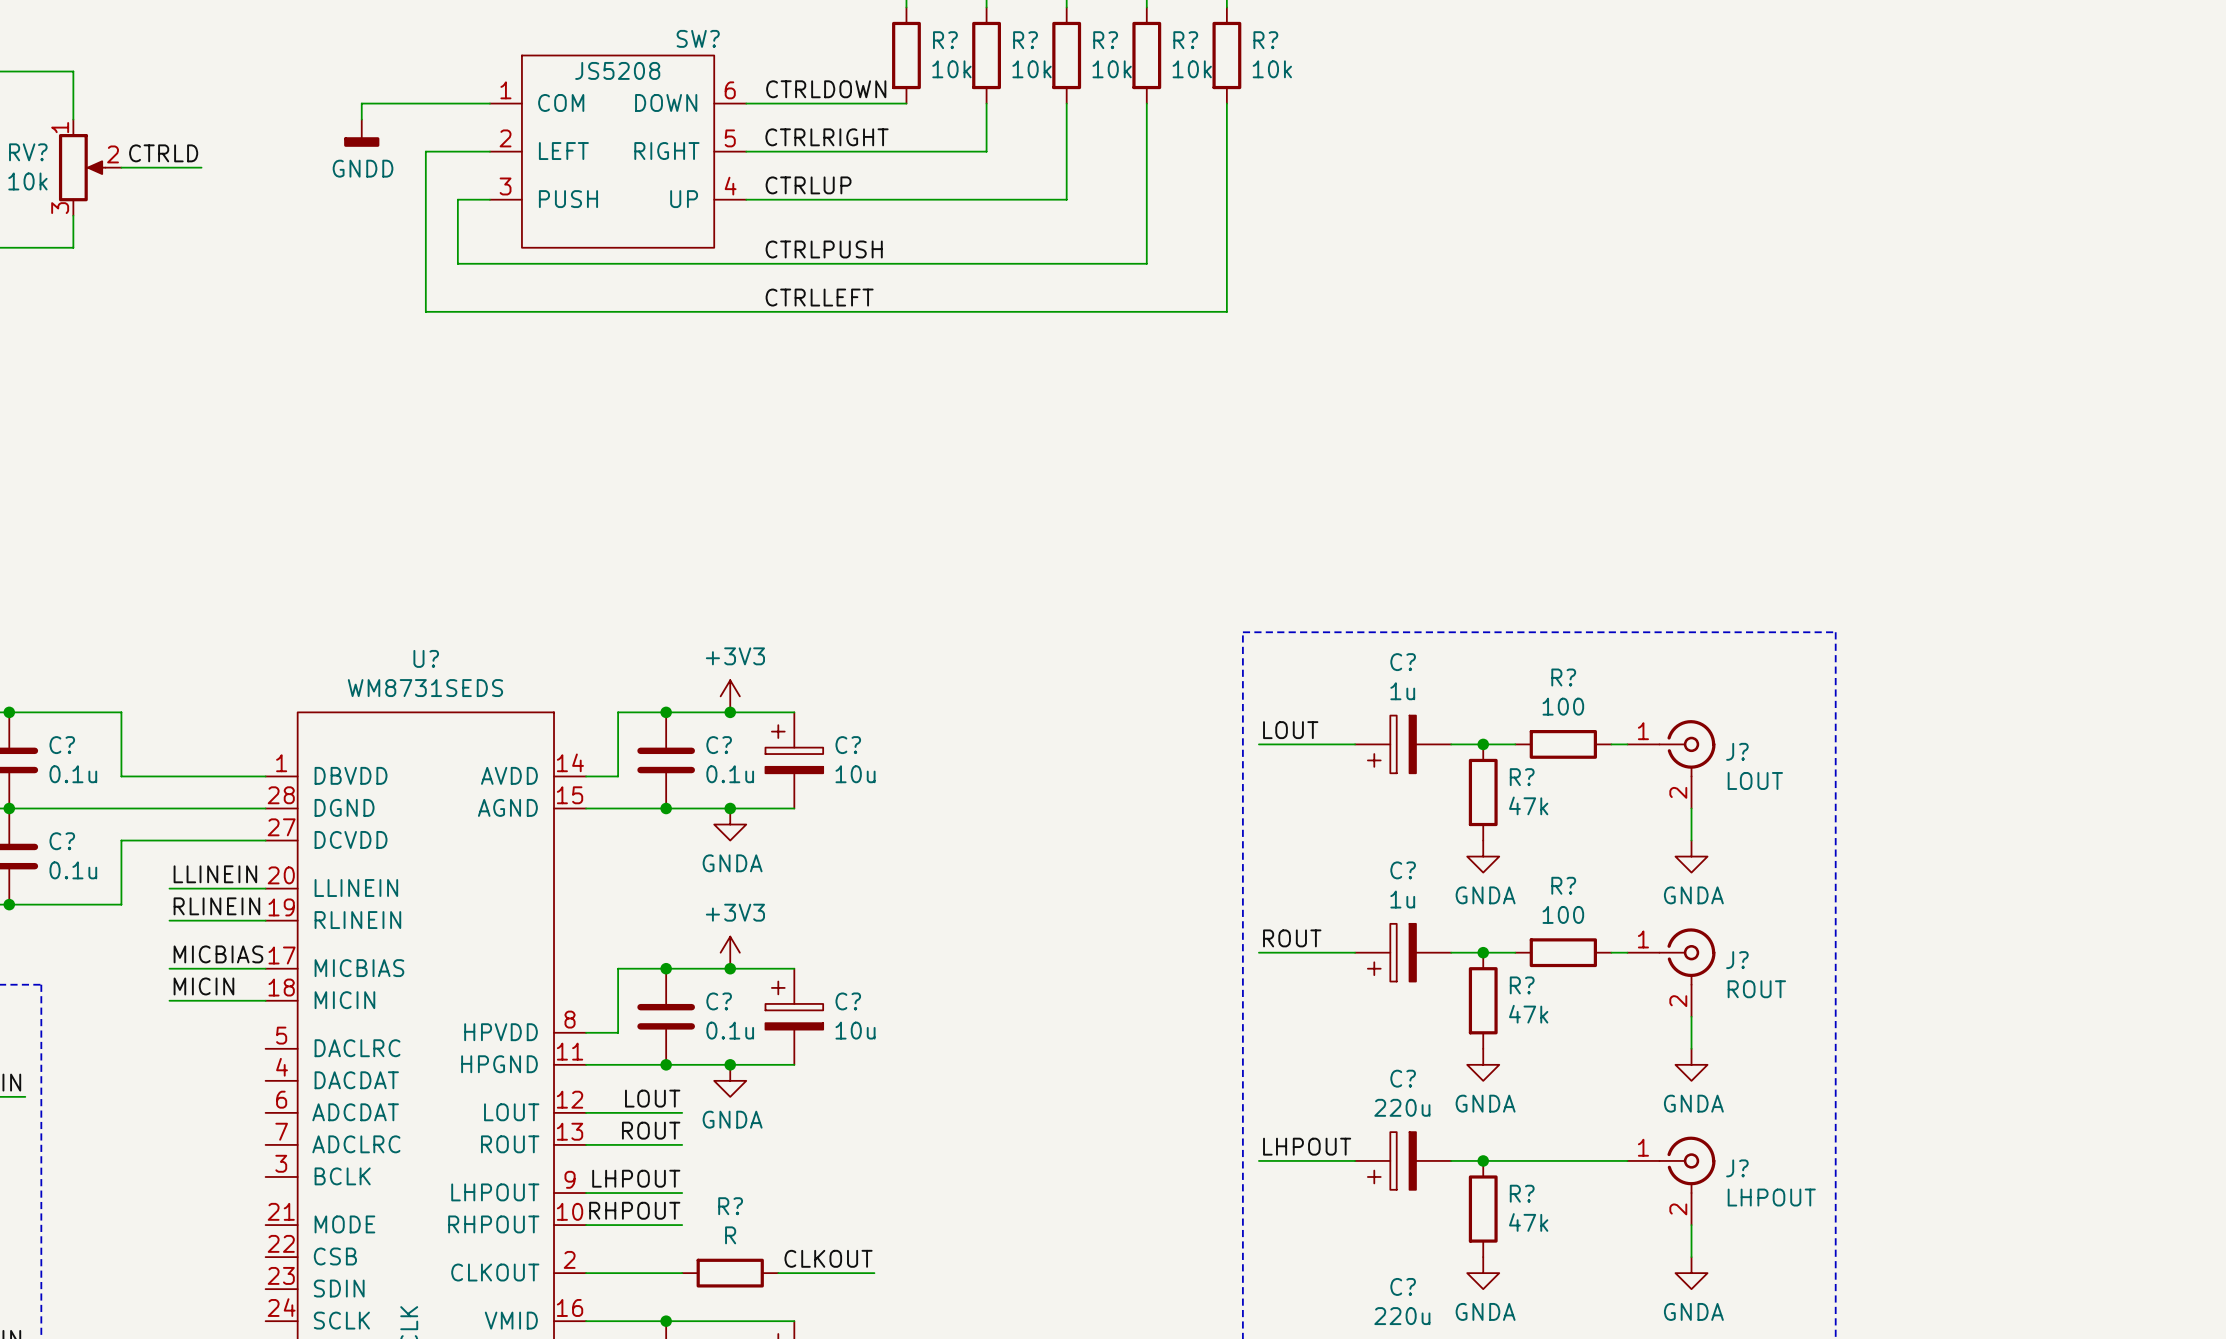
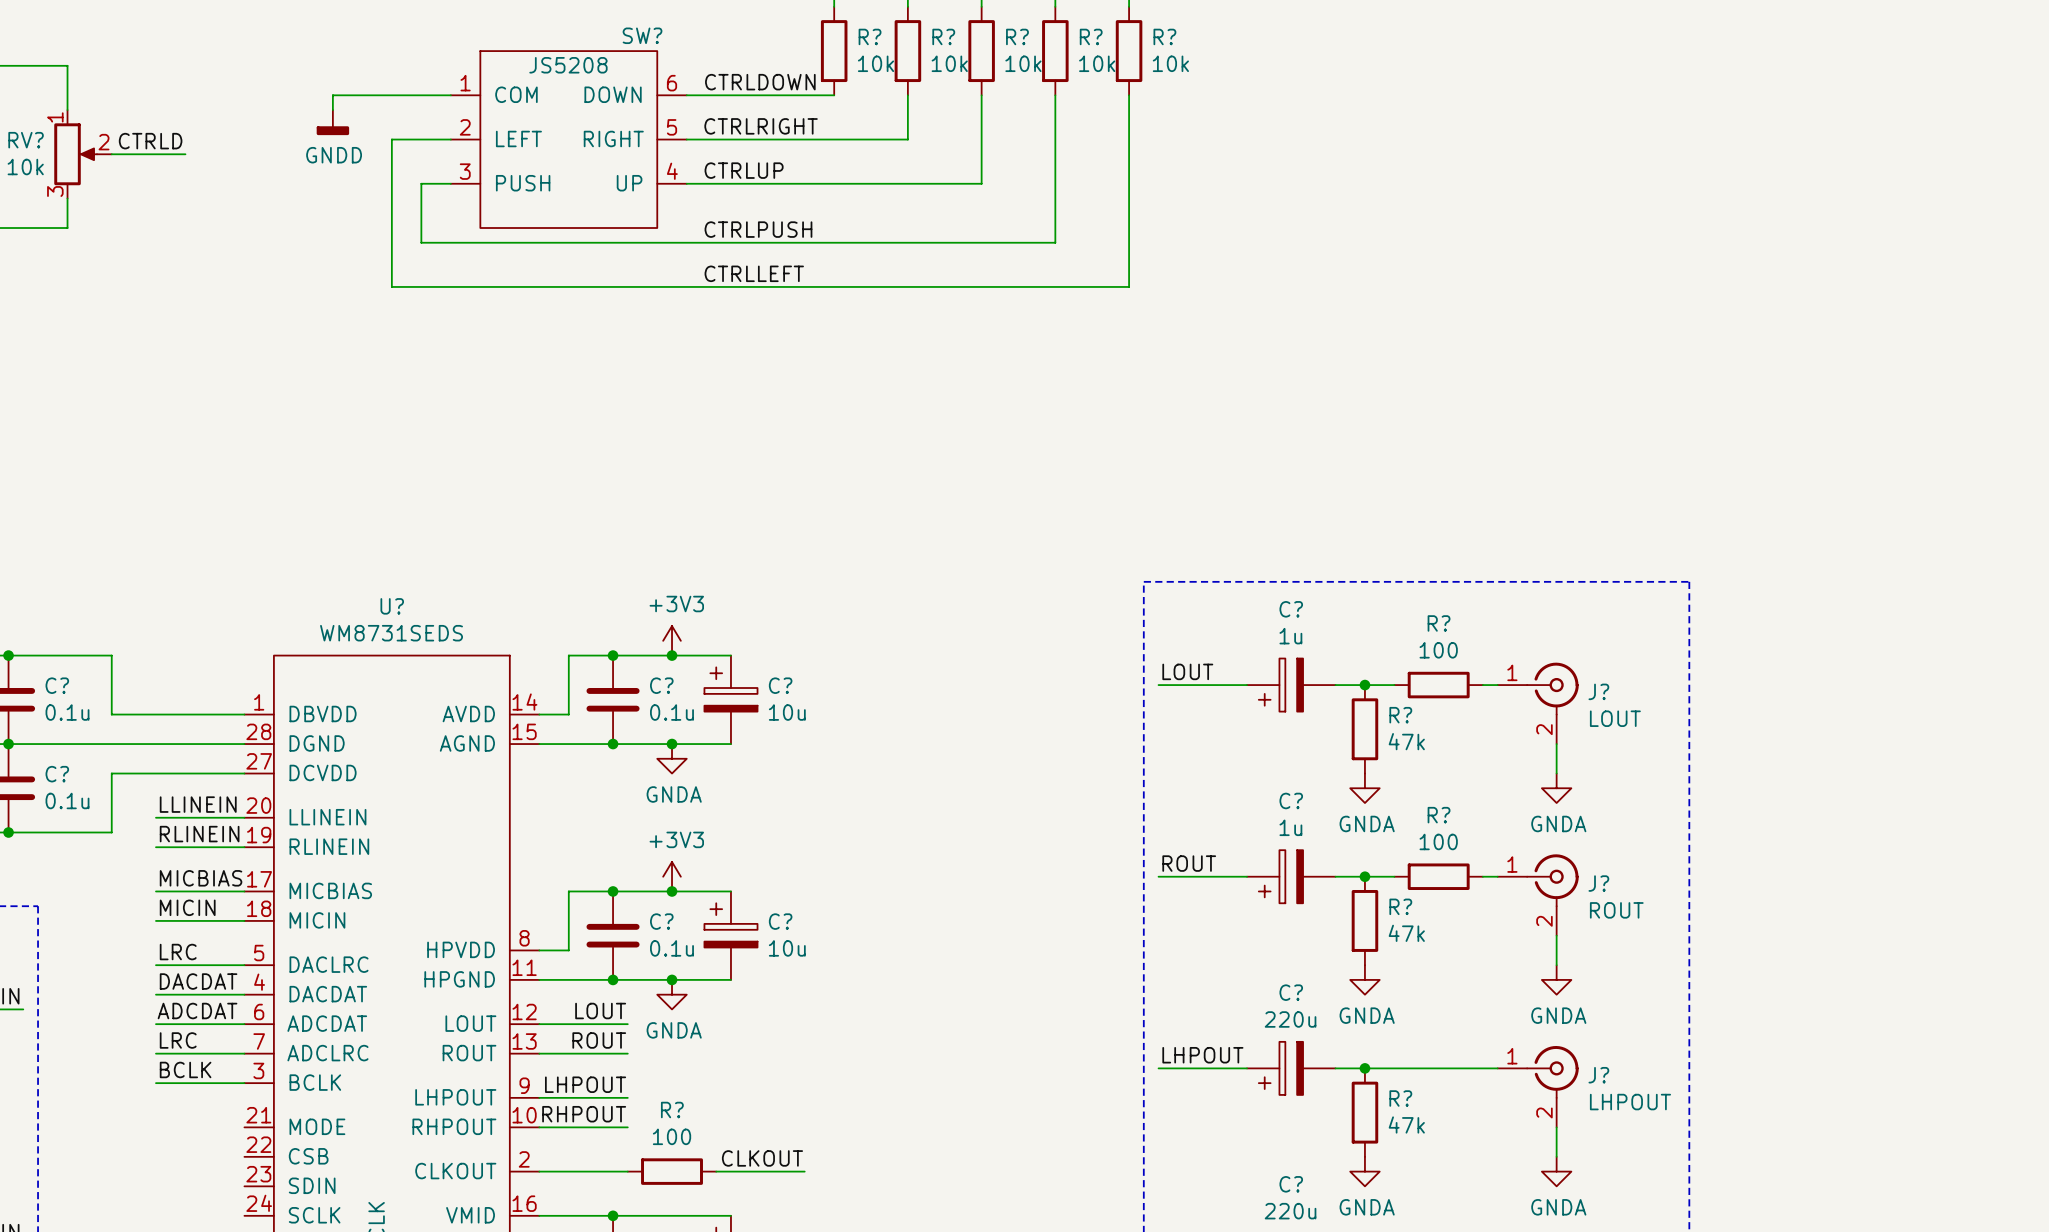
label: none -> LRC (178, 952)
wire: none -> (155, 965) (244, 965)
label: none -> DACDAT (198, 981)
wire: none -> (155, 994) (244, 994)
label: none -> ADCDAT (197, 1011)
wire: none -> (155, 1024) (244, 1024)
label: none -> LRC (178, 1040)
wire: none -> (155, 1053) (244, 1053)
label: none -> BCLK (185, 1069)
wire: none -> (155, 1083) (244, 1083)
R? value: R (730, 1235) -> 100 (672, 1136)

